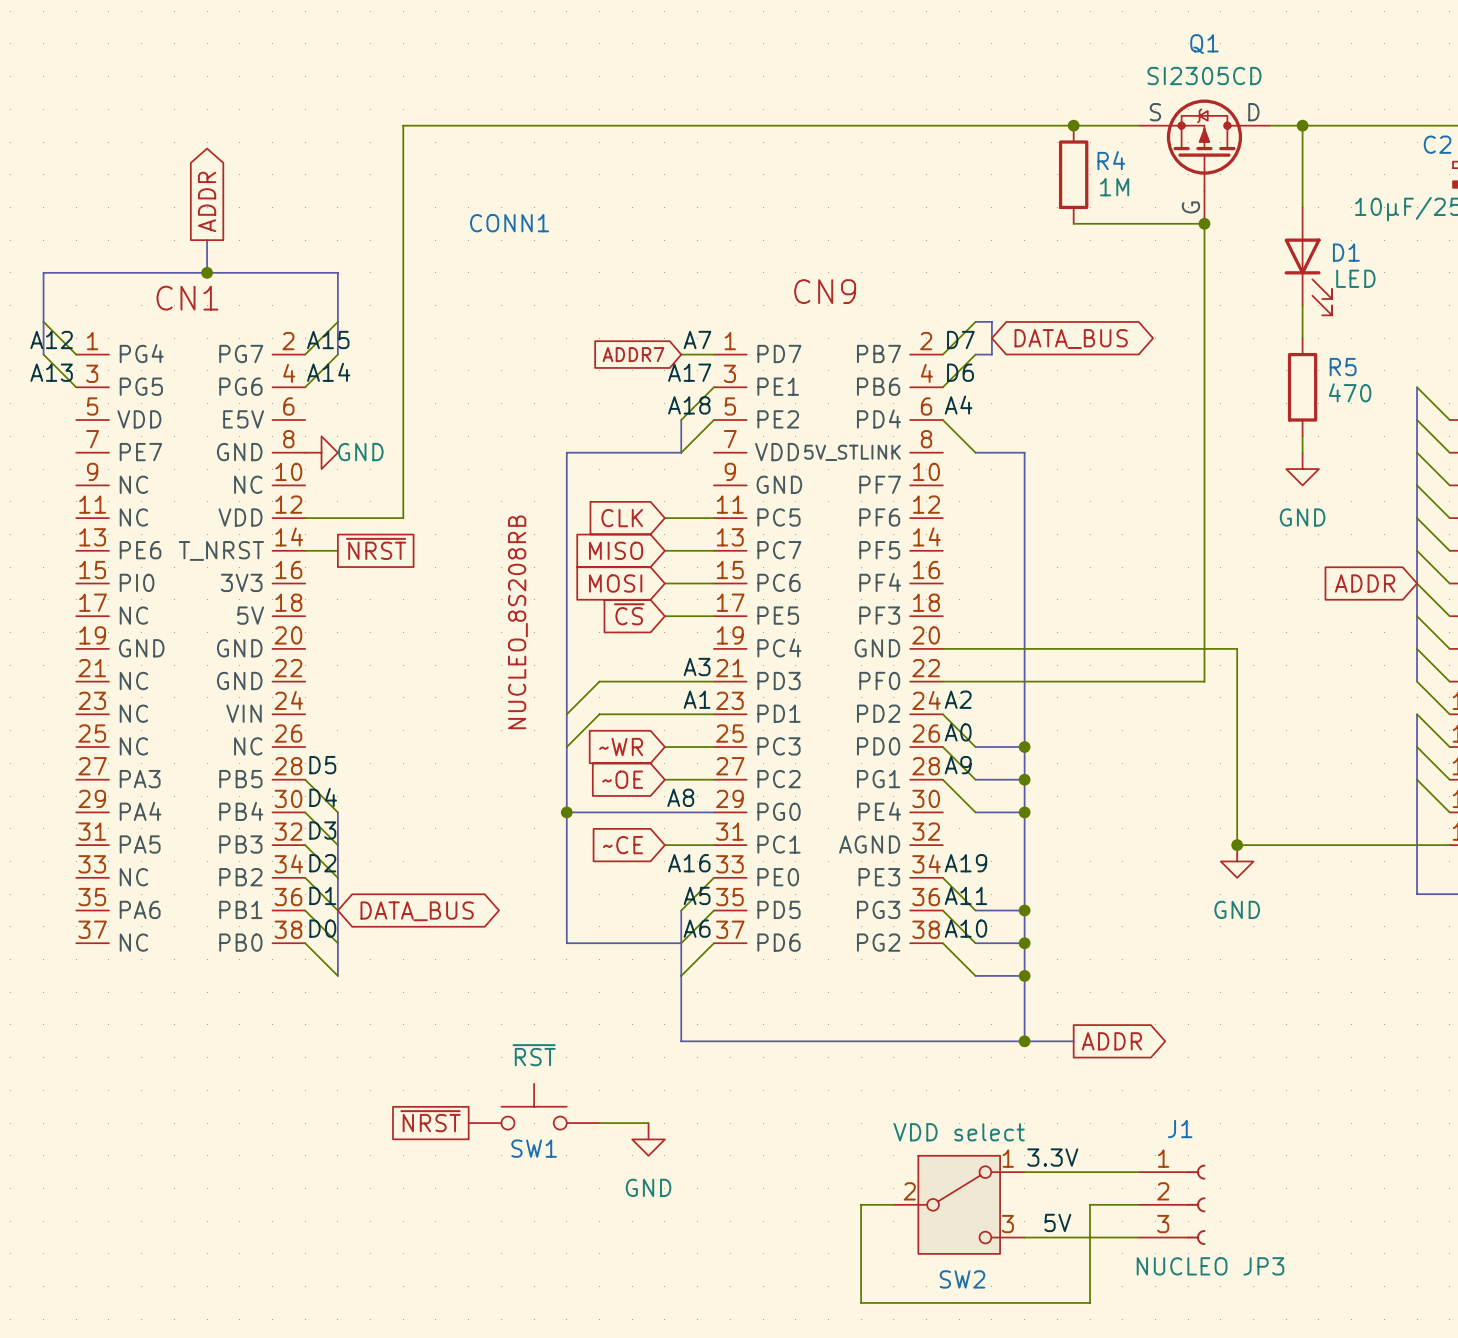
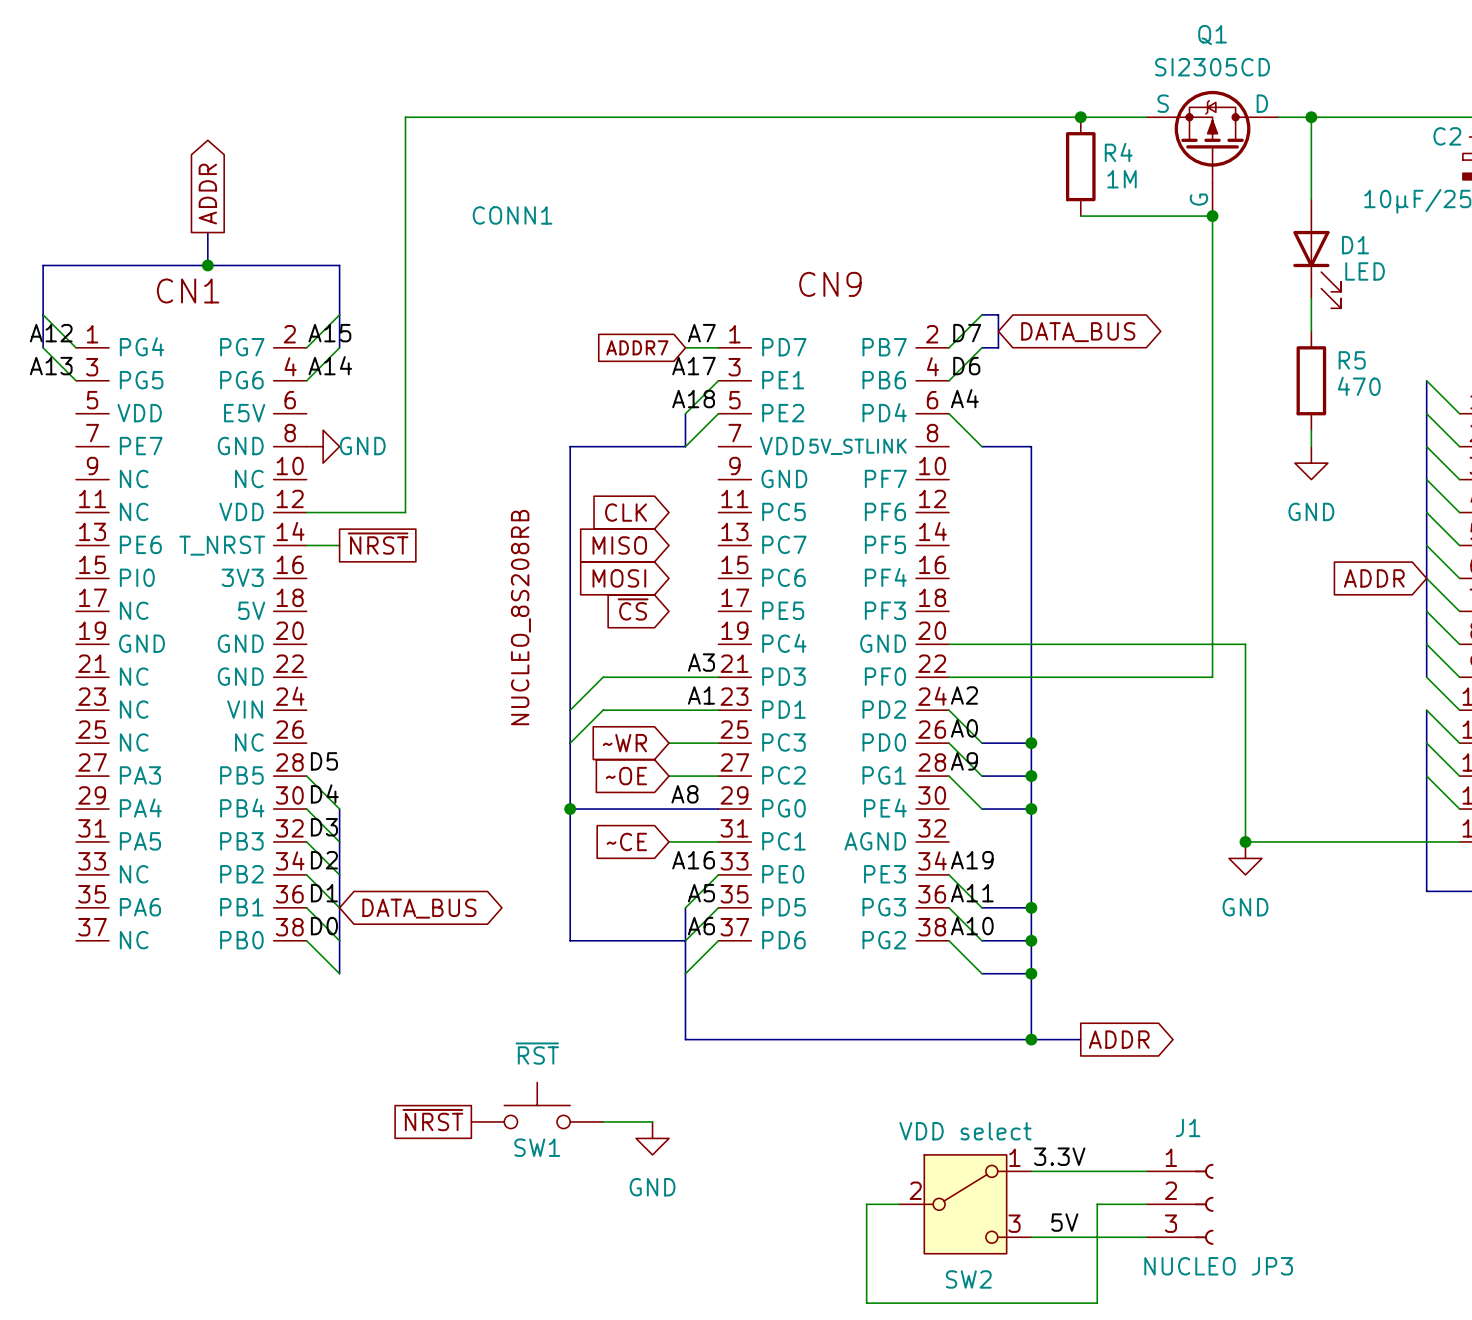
wire: (664, 518) (713, 518) -> none
wire: (664, 550) (713, 550) -> none
wire: (664, 583) (713, 583) -> none
wire: (664, 616) (713, 616) -> none

